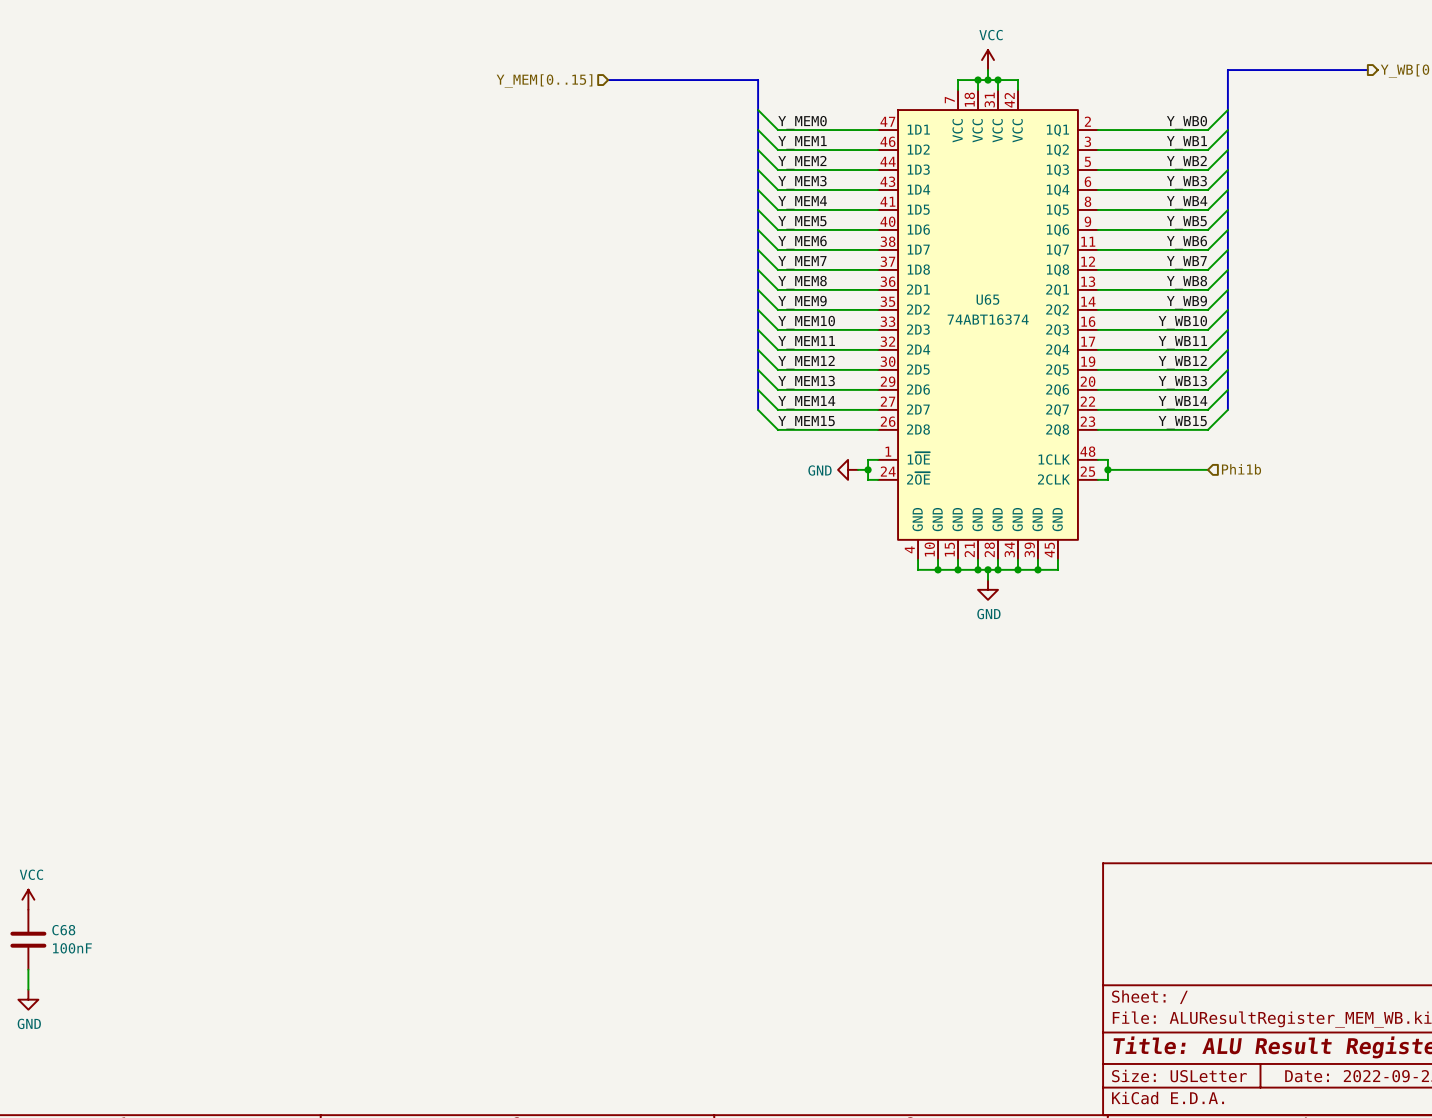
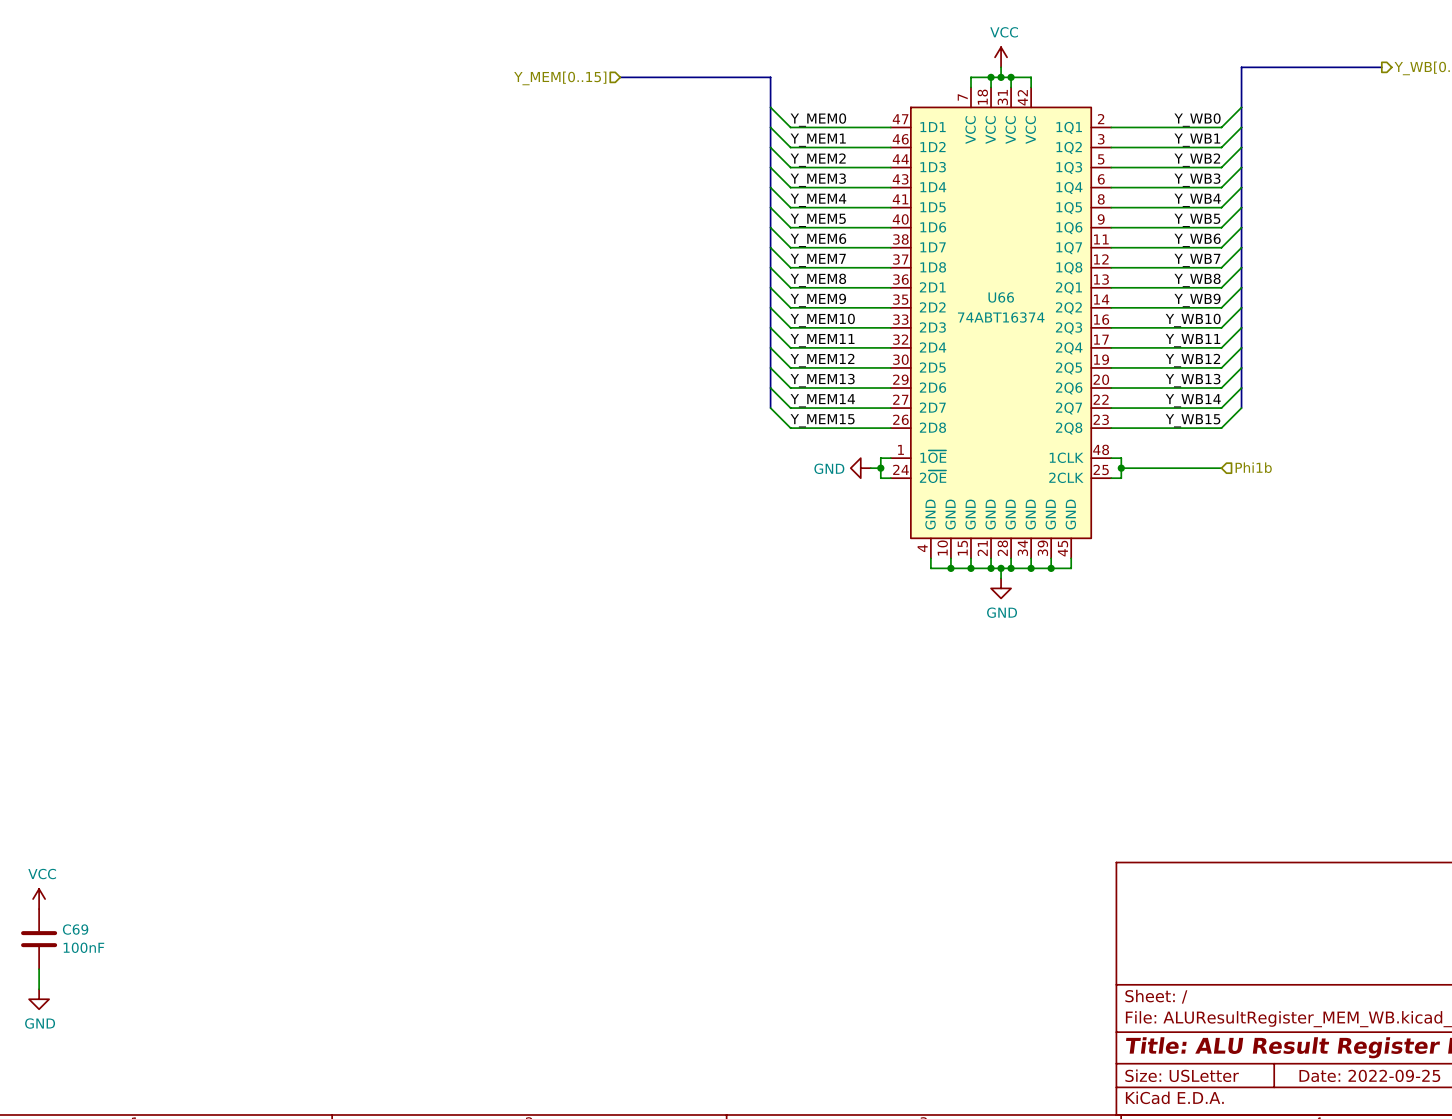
U65 name: U65 (987, 299) -> U66 (1001, 297)
C68 name: C68 (63, 930) -> C69 (75, 929)

